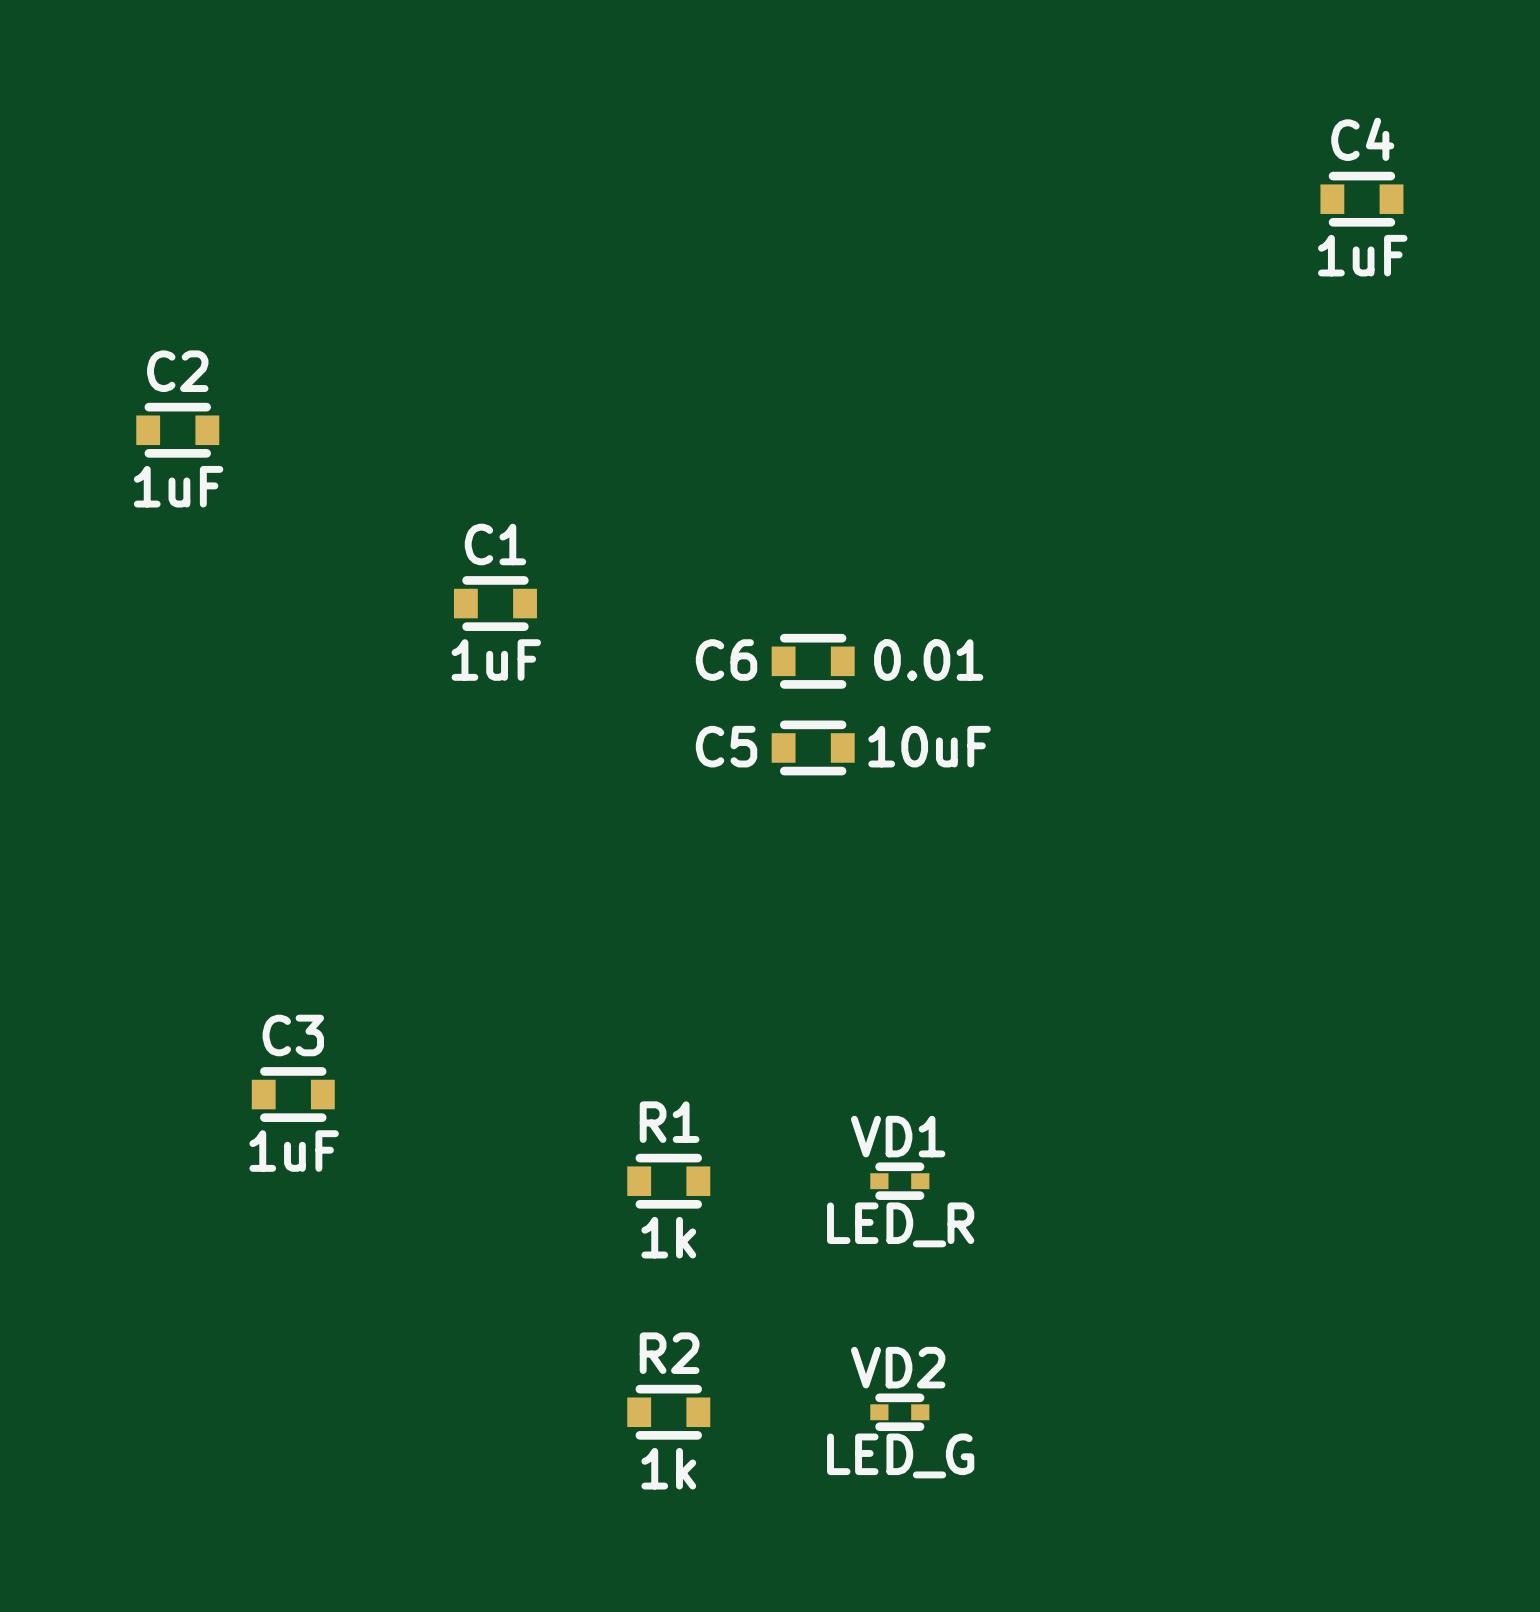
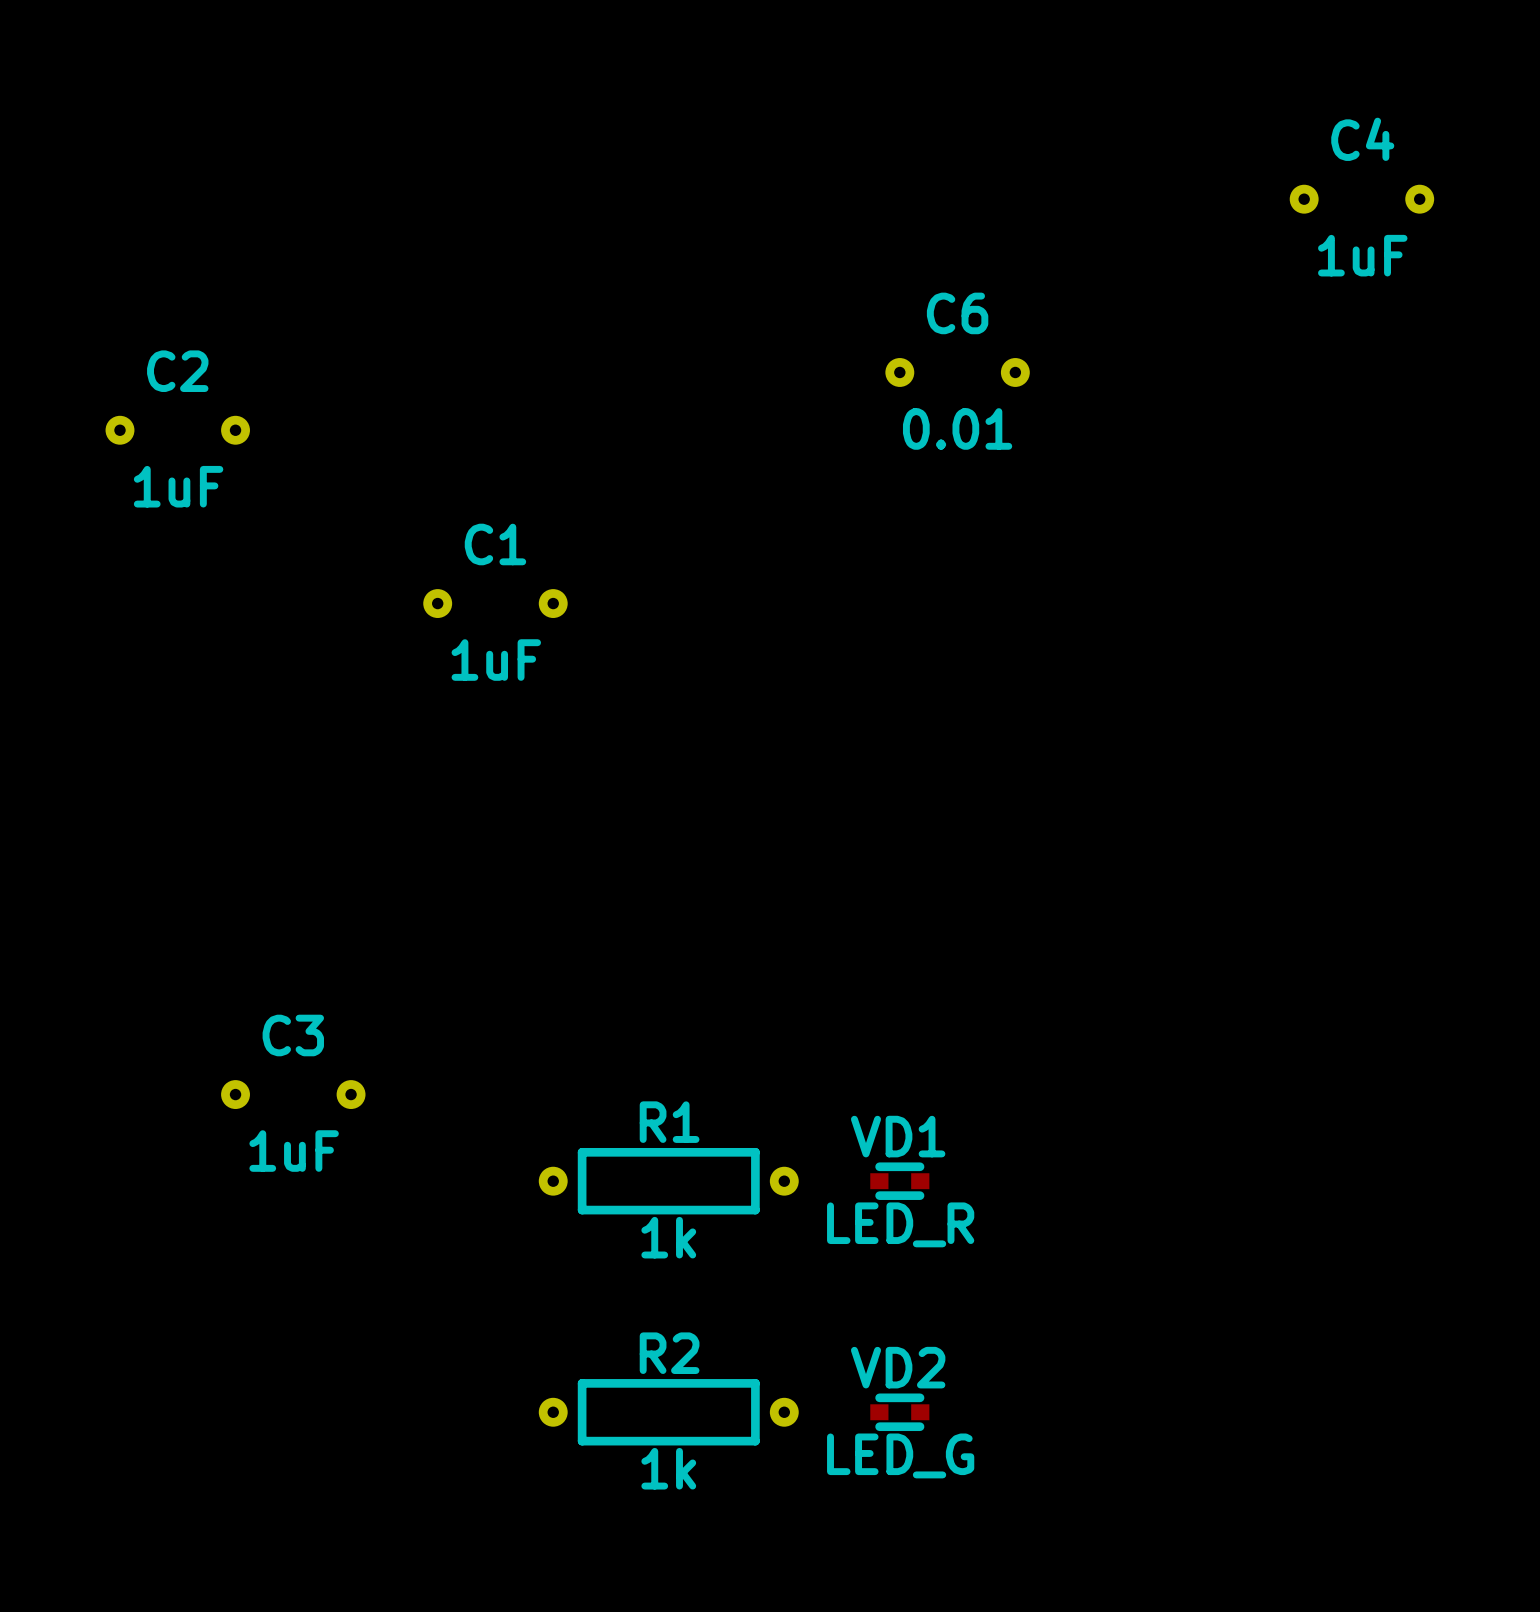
C4 footprint: [1320, 171, 1404, 227] -> [1289, 184, 1435, 214]
C2 footprint: [136, 402, 220, 458] -> [105, 415, 250, 445]
C1 footprint: [453, 576, 537, 631] -> [423, 589, 568, 618]
C6 footprint: [771, 633, 855, 689] -> [885, 358, 1030, 387]
C6 name position: C6 (726, 660) -> C6 (957, 313)
C6 value position: 0.01 (928, 660) -> 0.01 (957, 428)
C5: 10uF (813, 747) -> none
C3 footprint: [251, 1067, 335, 1122] -> [221, 1080, 366, 1109]
R1 footprint: [627, 1153, 711, 1209] -> [538, 1147, 799, 1215]
R2 footprint: [627, 1384, 711, 1440] -> [538, 1379, 799, 1446]

